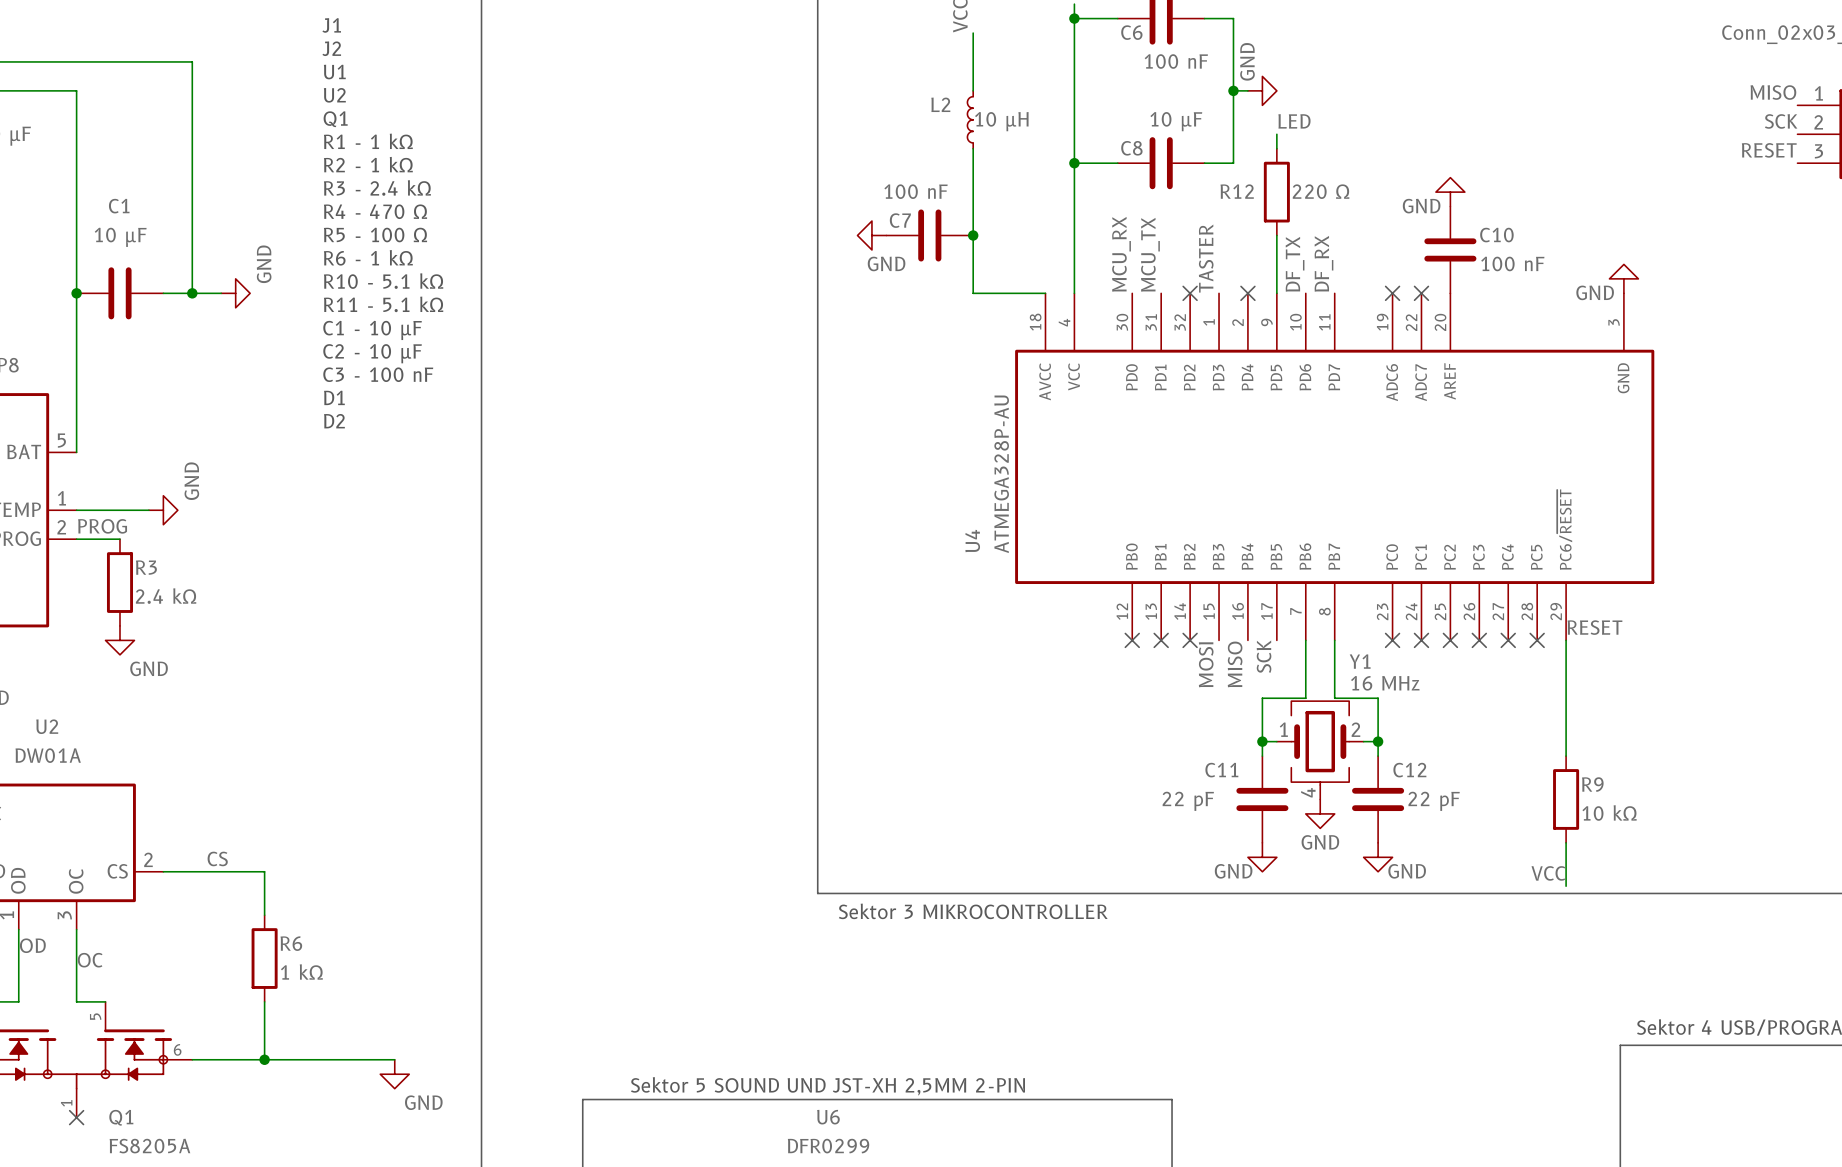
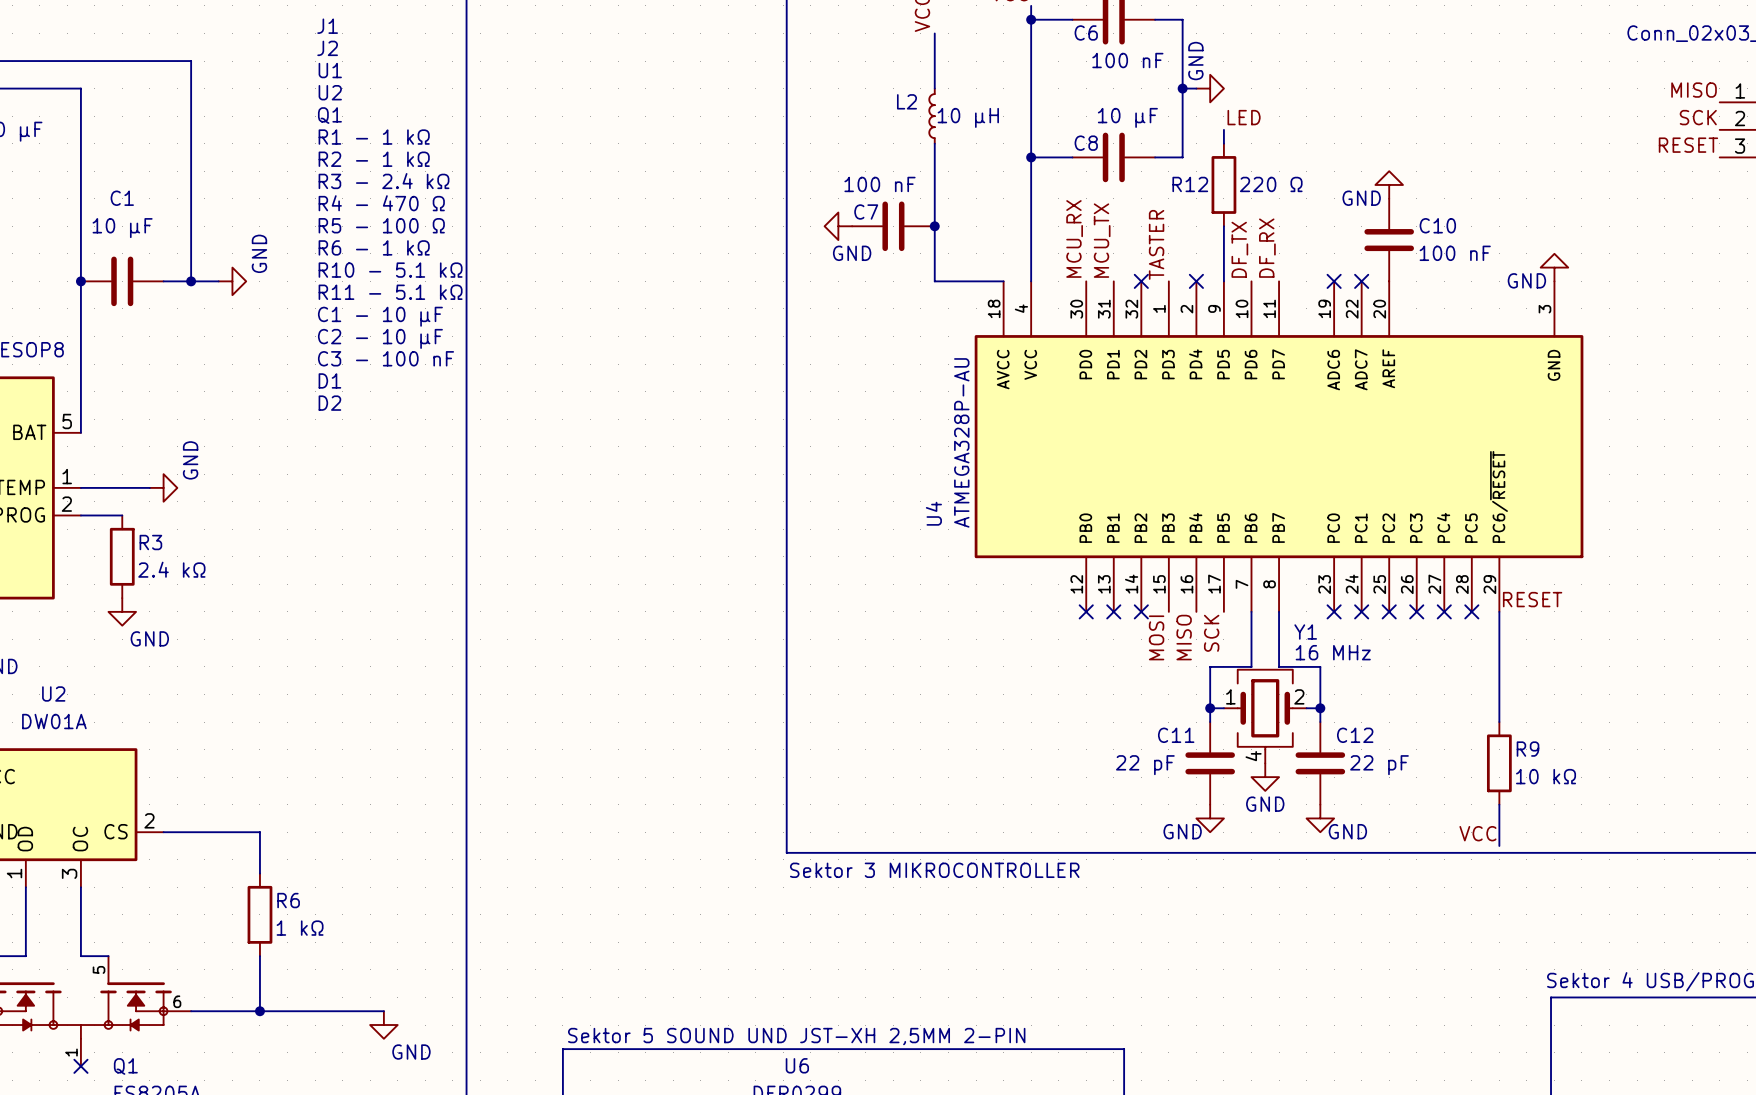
label: PROG (102, 526) -> none
label: CS (217, 858) -> none
label: OD (32, 945) -> none
label: OC (90, 960) -> none

